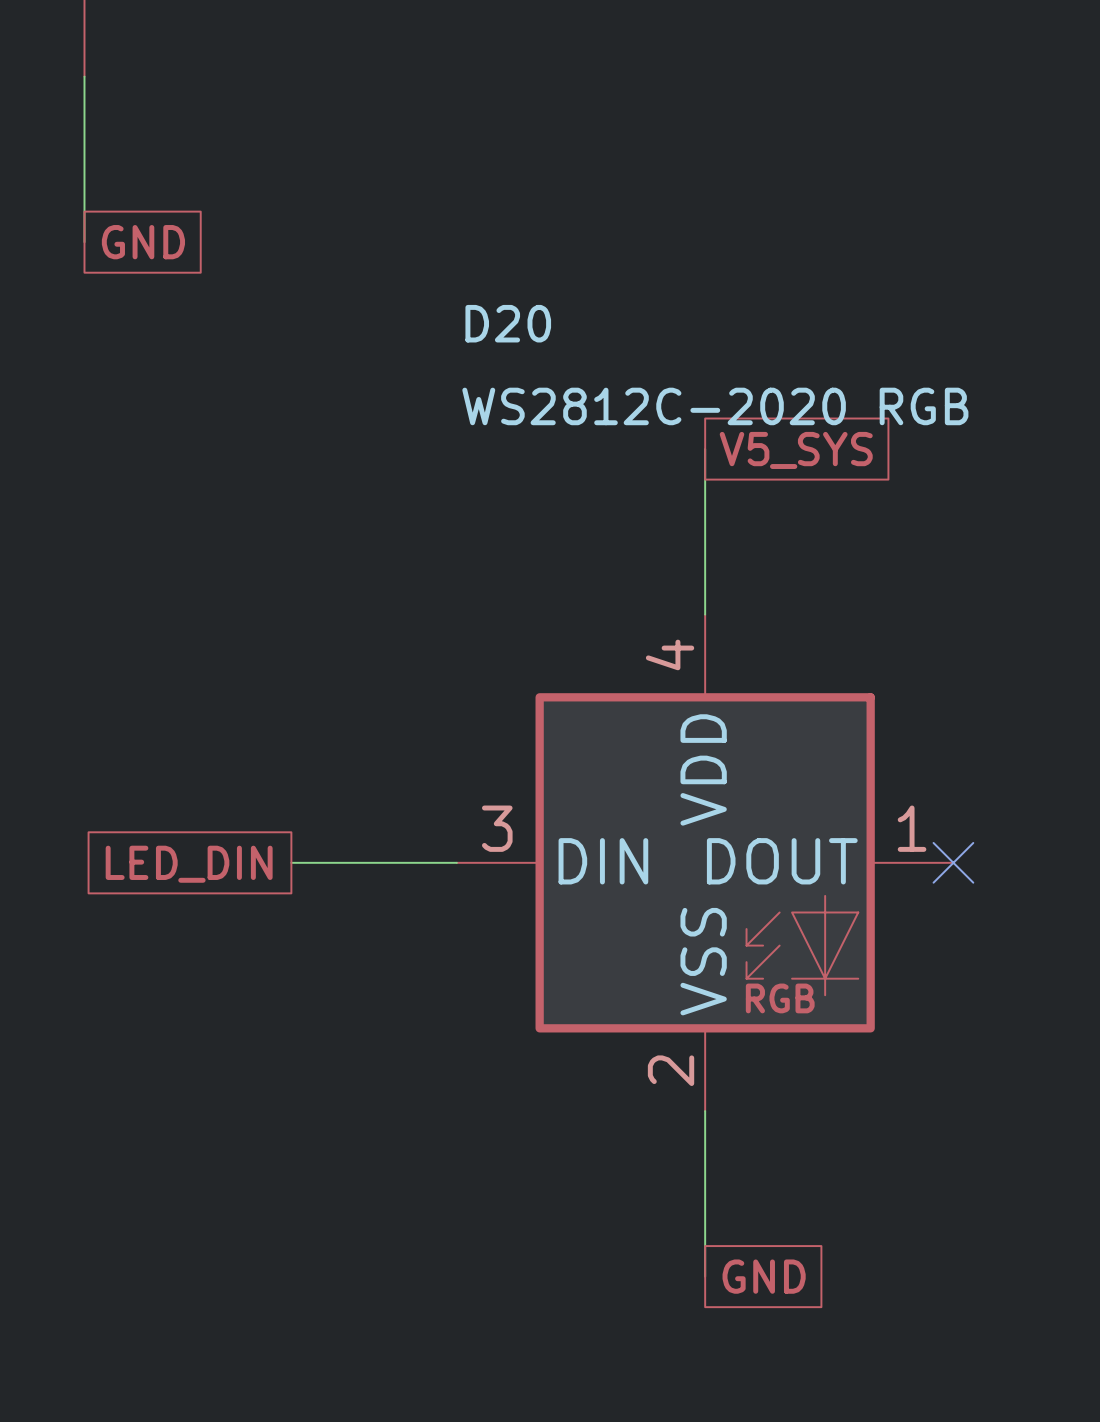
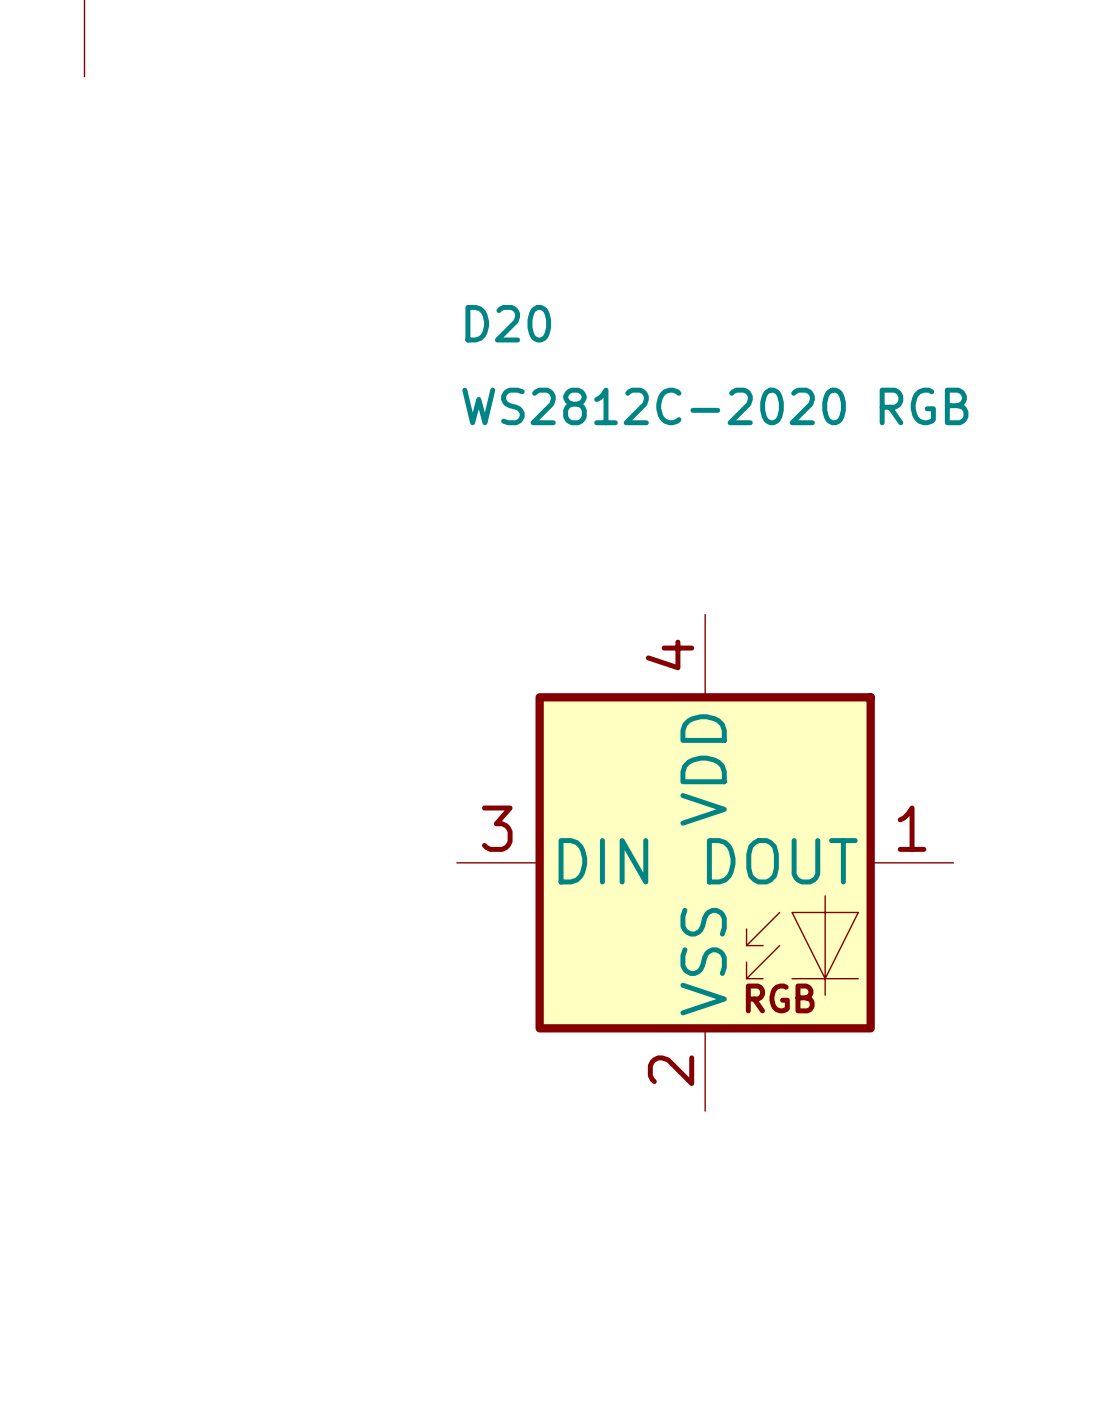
wire: (84, 76) (84, 242) -> none
global label: GND (143, 242) -> none
wire: (705, 449) (705, 614) -> none
global label: V5_SYS (796, 450) -> none
wire: (291, 862) (456, 862) -> none
no-connect mark: (953, 862) -> none
global label: LED_DIN (189, 864) -> none
wire: (705, 1111) (705, 1276) -> none
global label: GND (764, 1276) -> none

